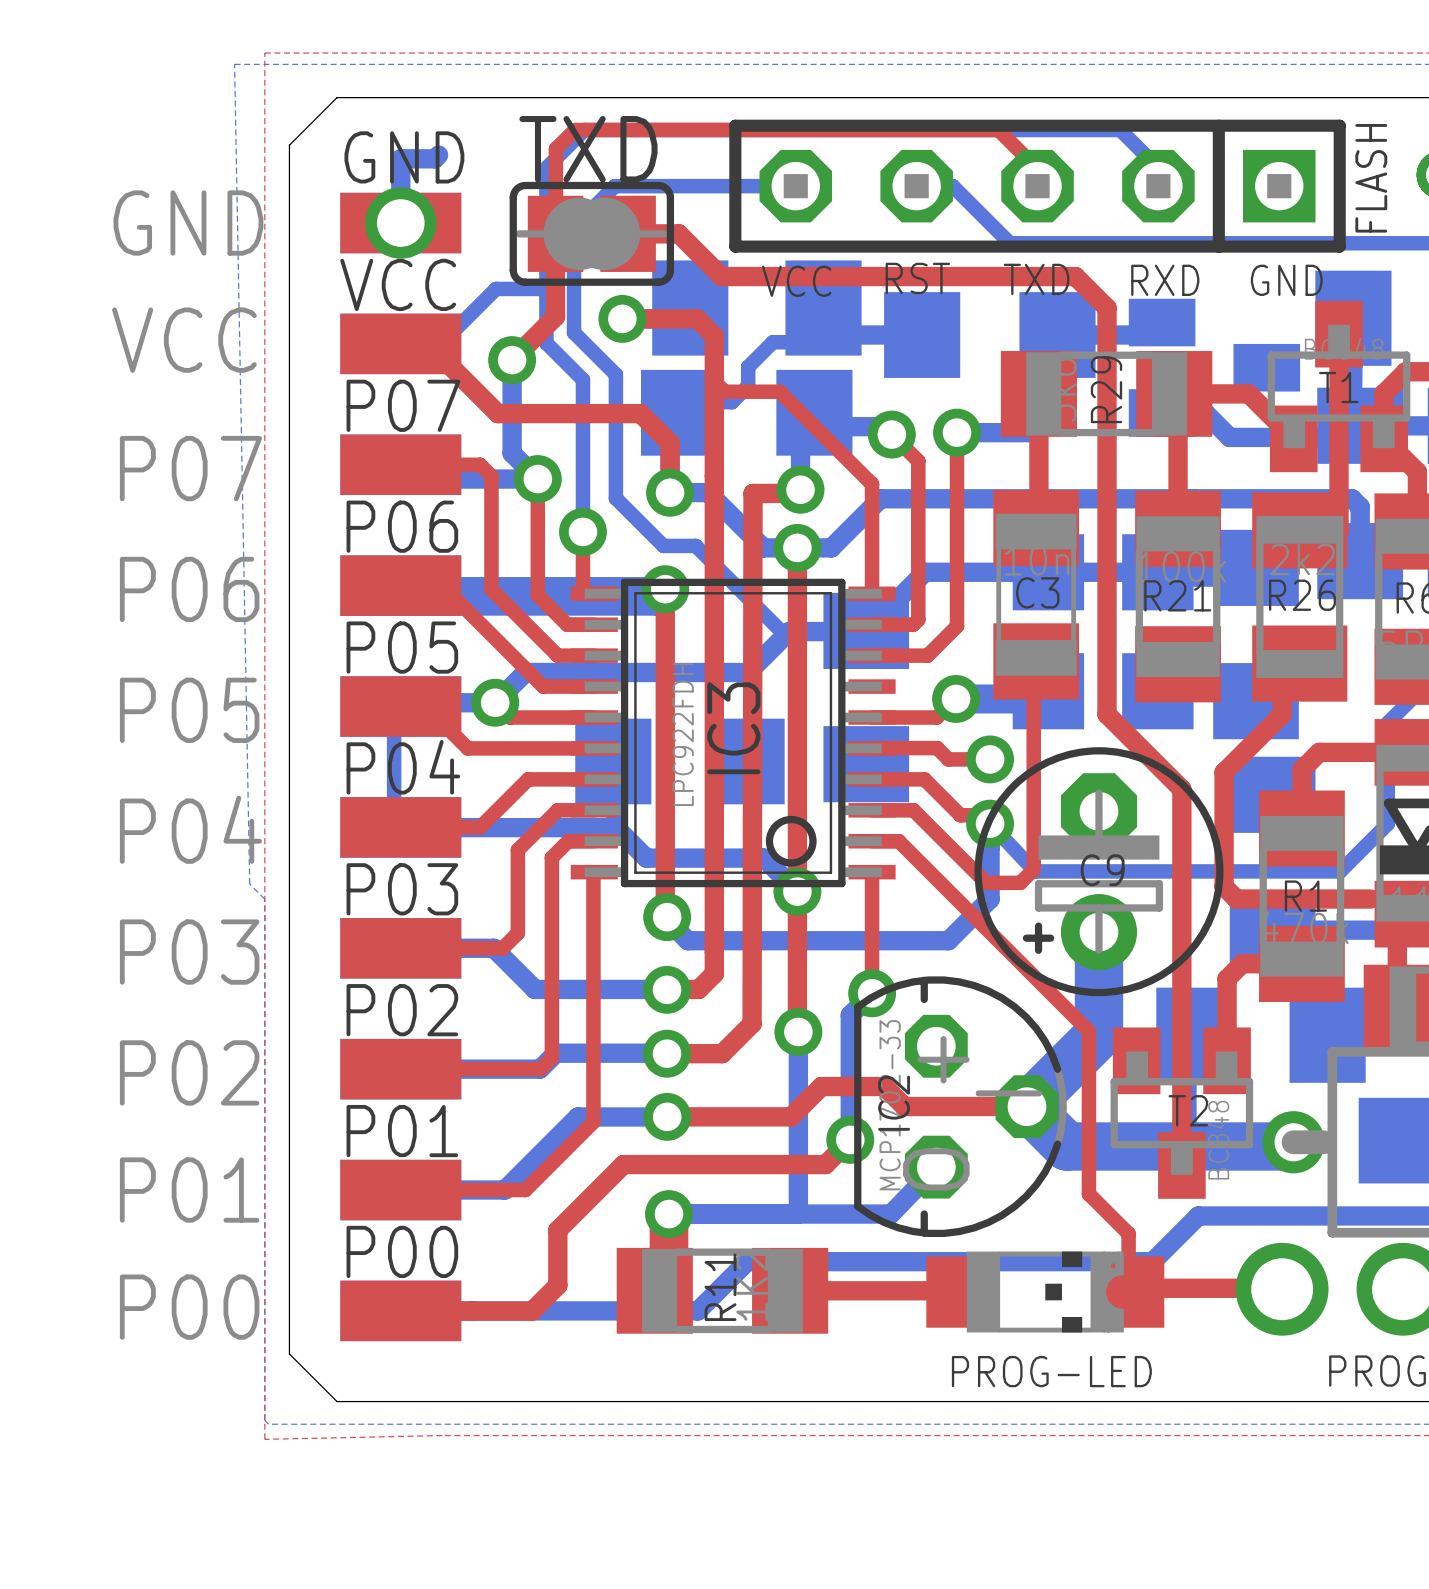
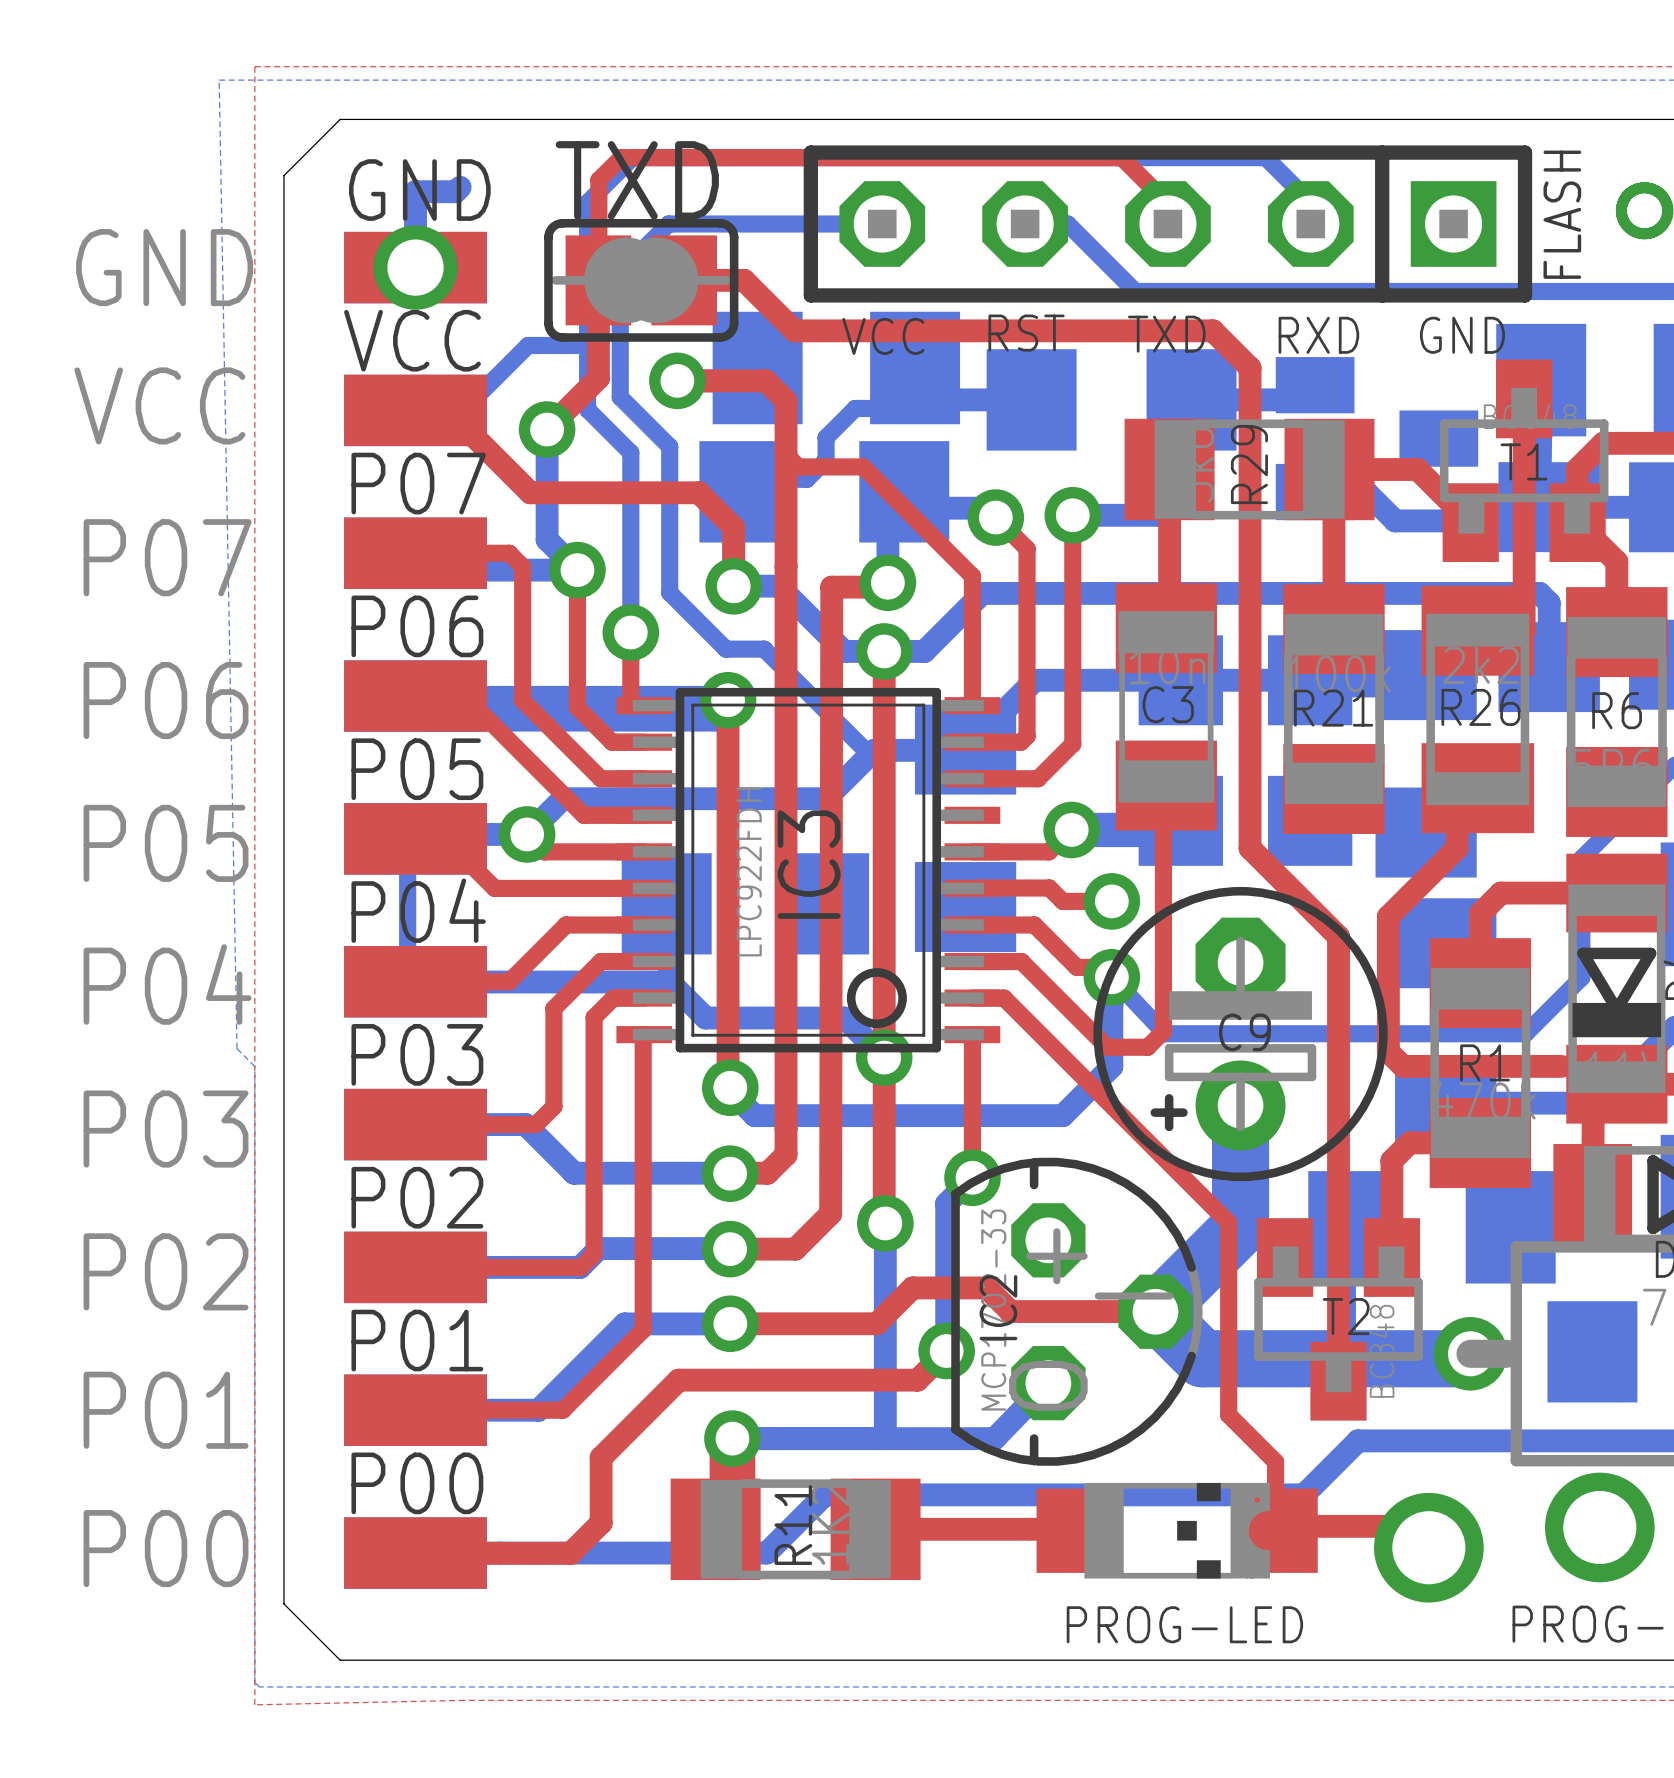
via position: (1282, 1289) -> (1428, 1547)

